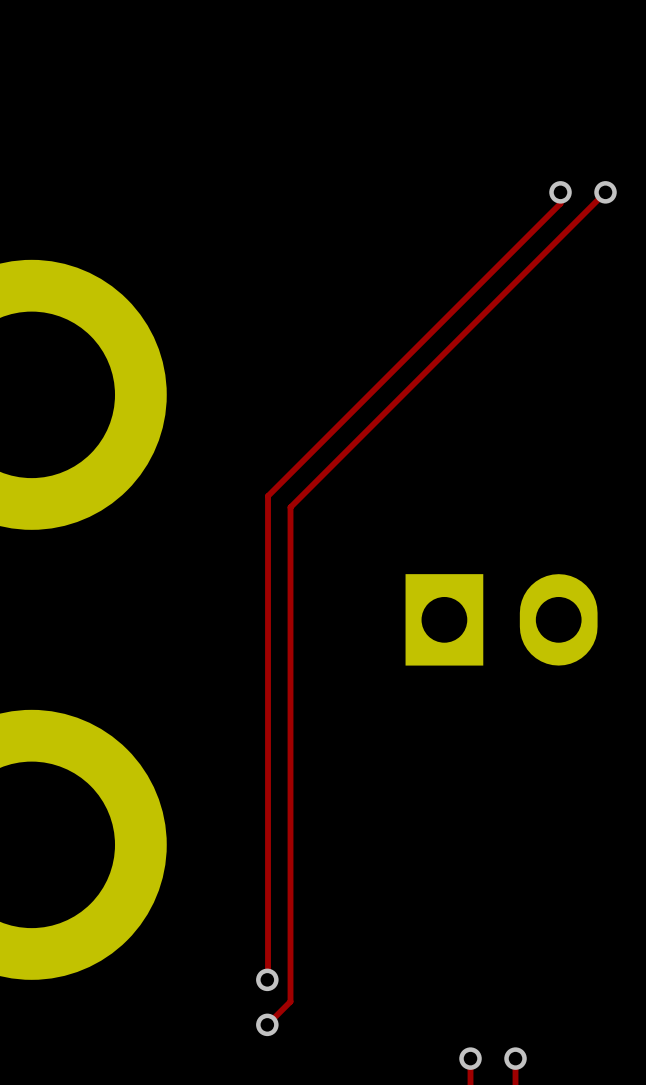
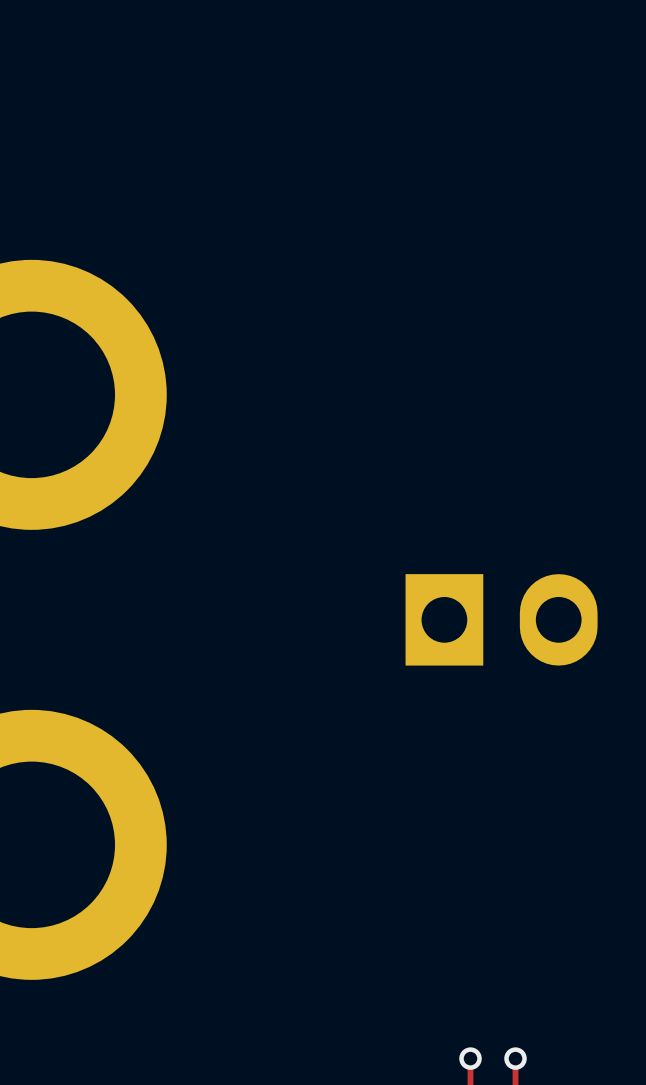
track: (560, 192) (560, 203) (268, 496) (267, 979) -> none
via: (560, 192) -> none
track: (605, 192) (290, 507) (290, 1001) (267, 1024) -> none
via: (605, 192) -> none
via: (267, 979) -> none
via: (267, 1024) -> none

